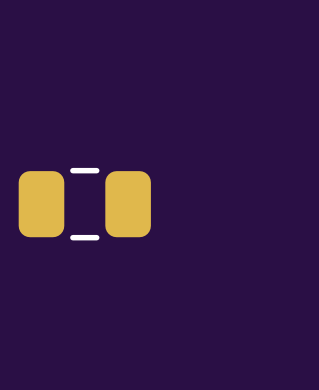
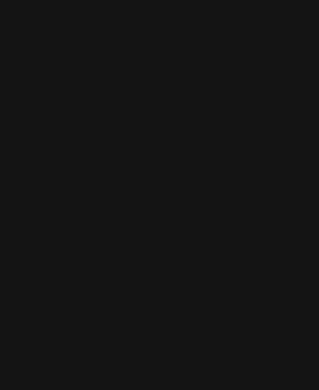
part: (84, 204) -> none

